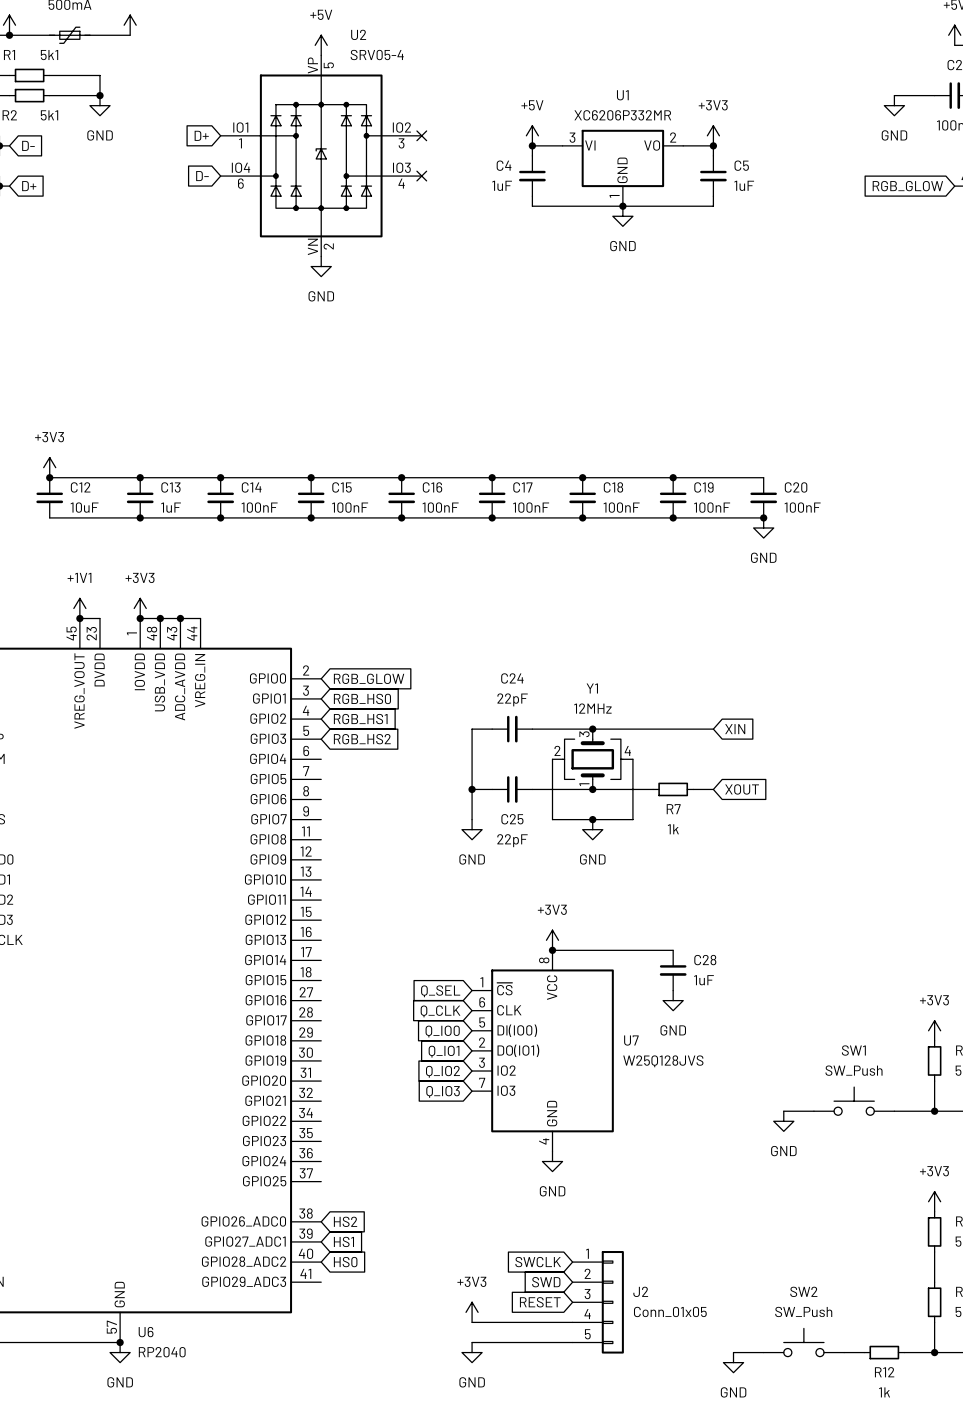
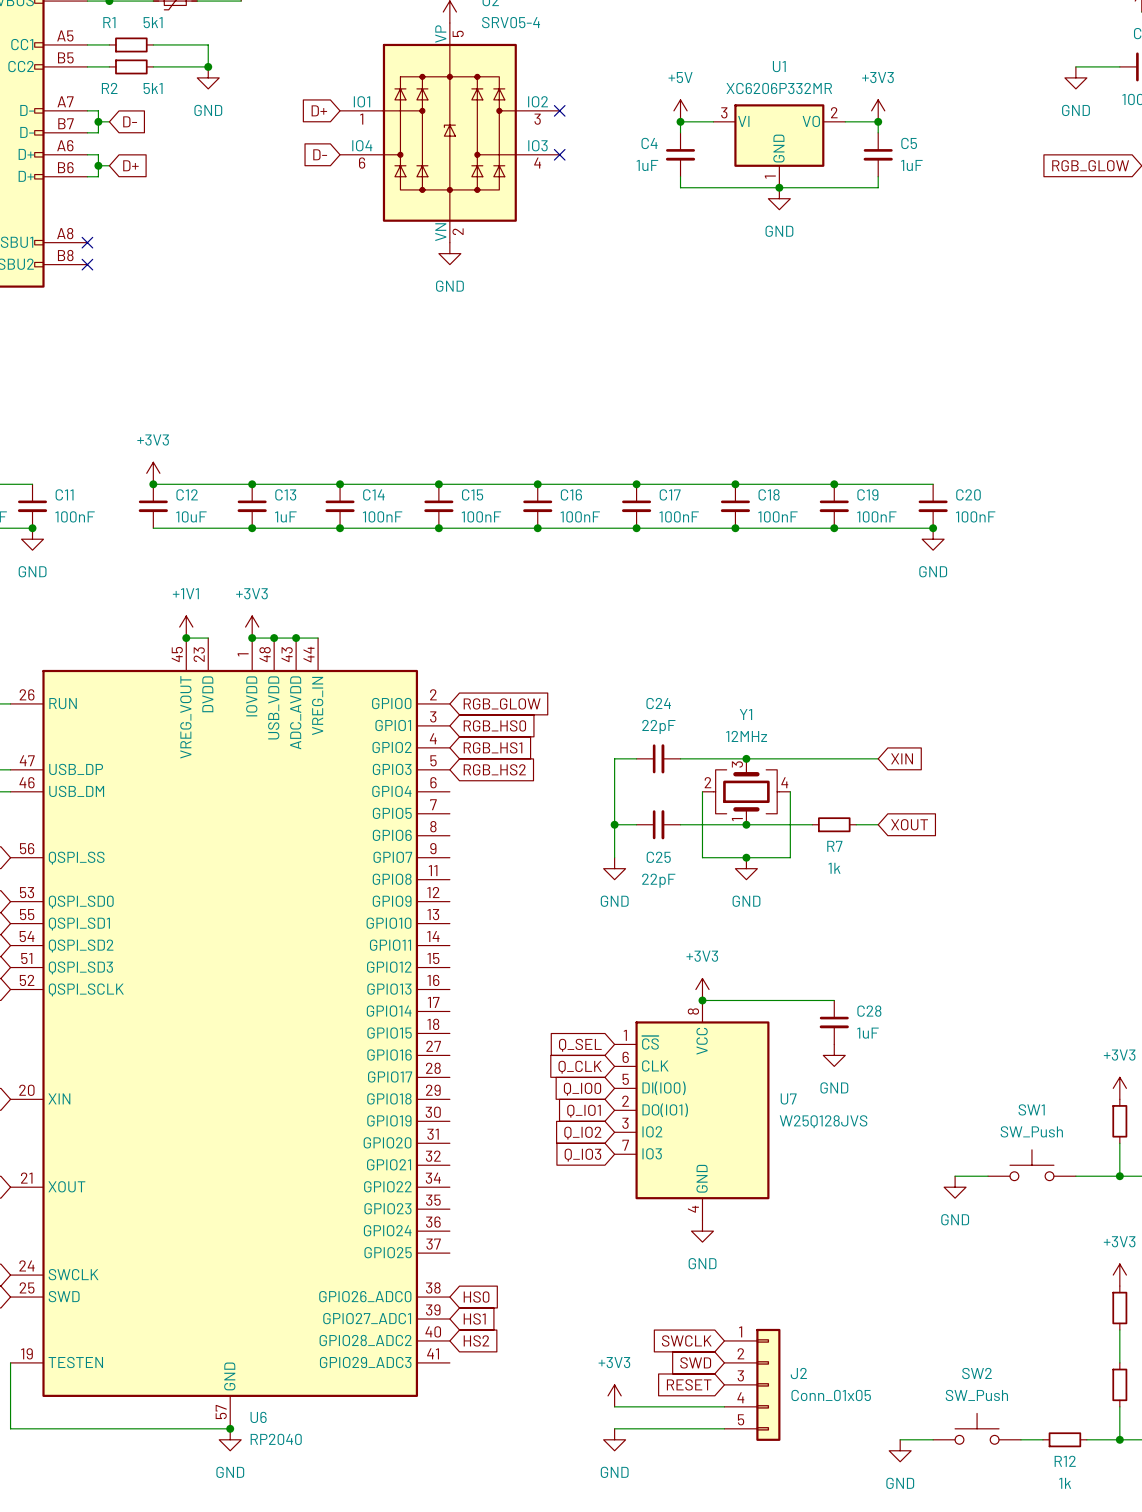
global label: HS2 (345, 1221) -> HS0 (476, 1297)
global label: HS0 (345, 1262) -> HS2 (476, 1340)

